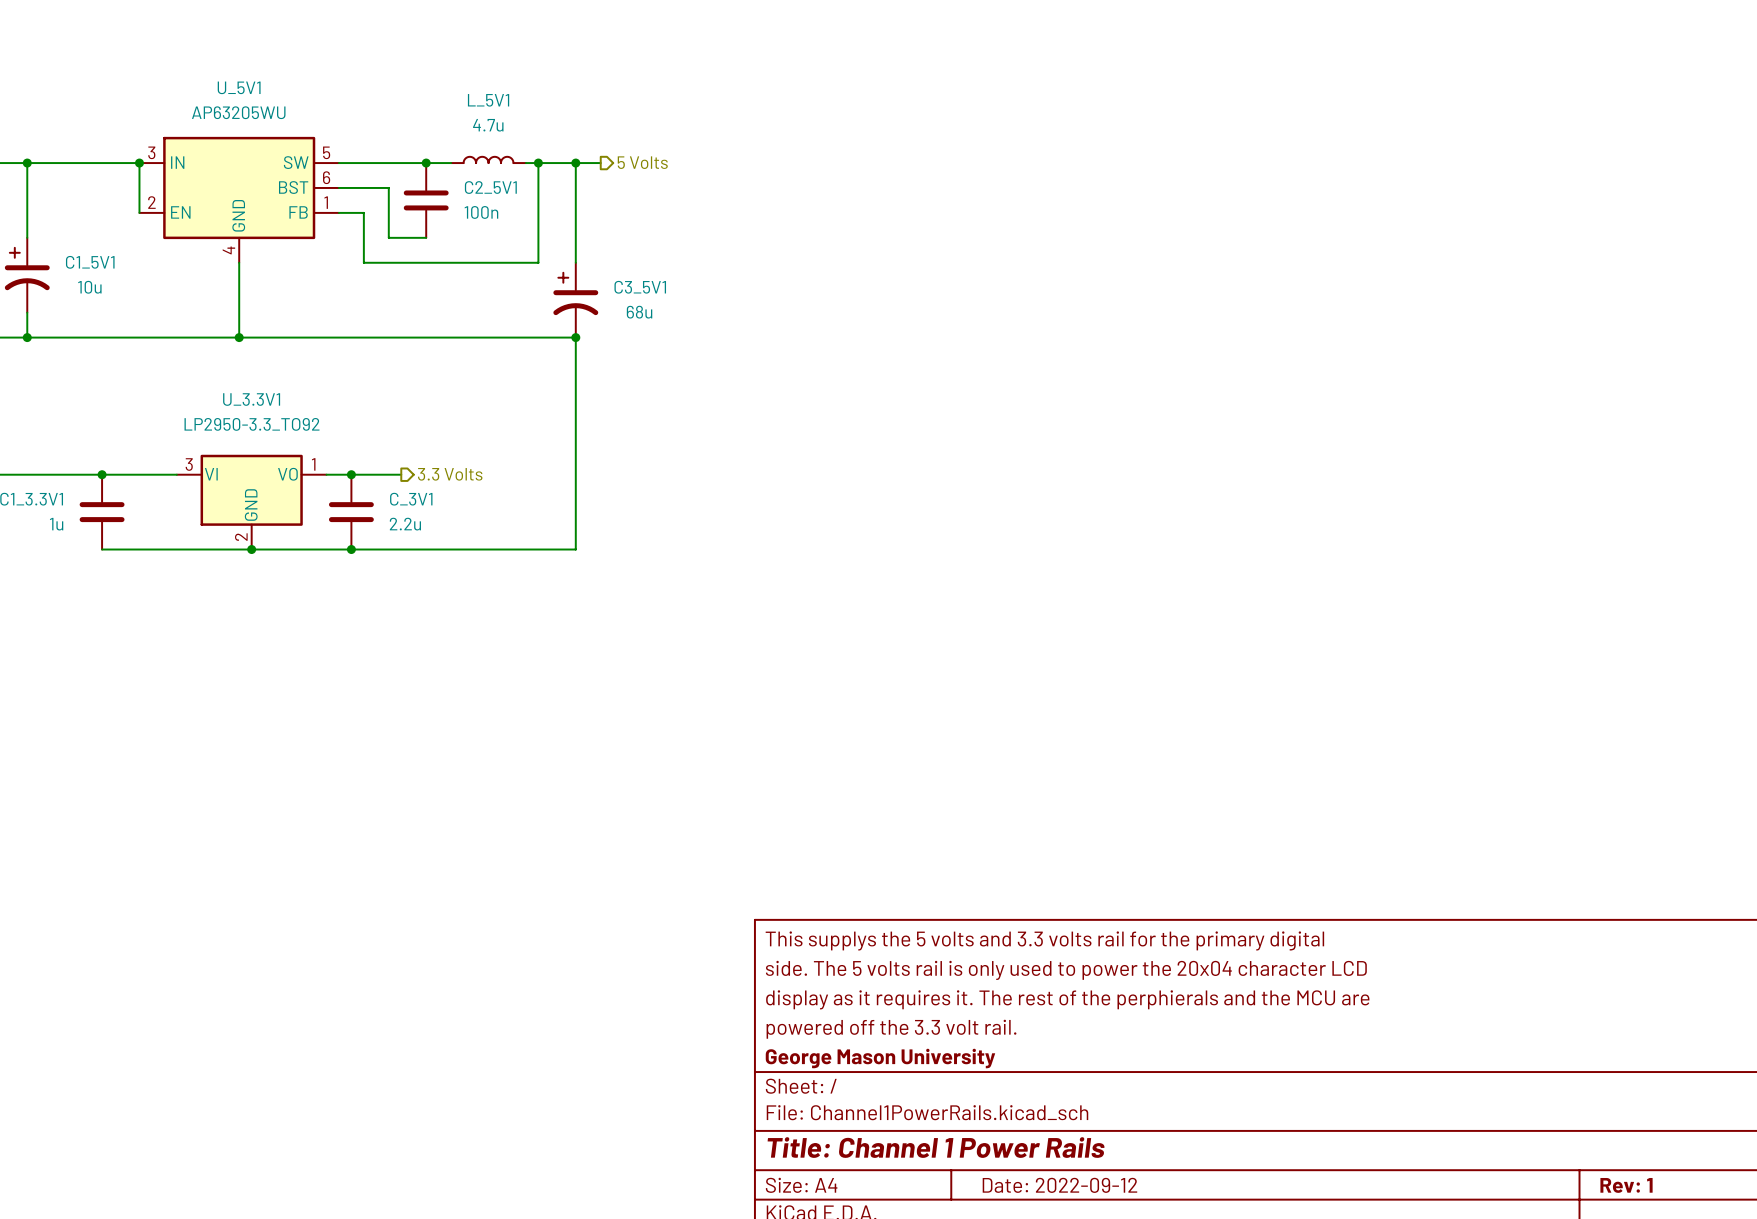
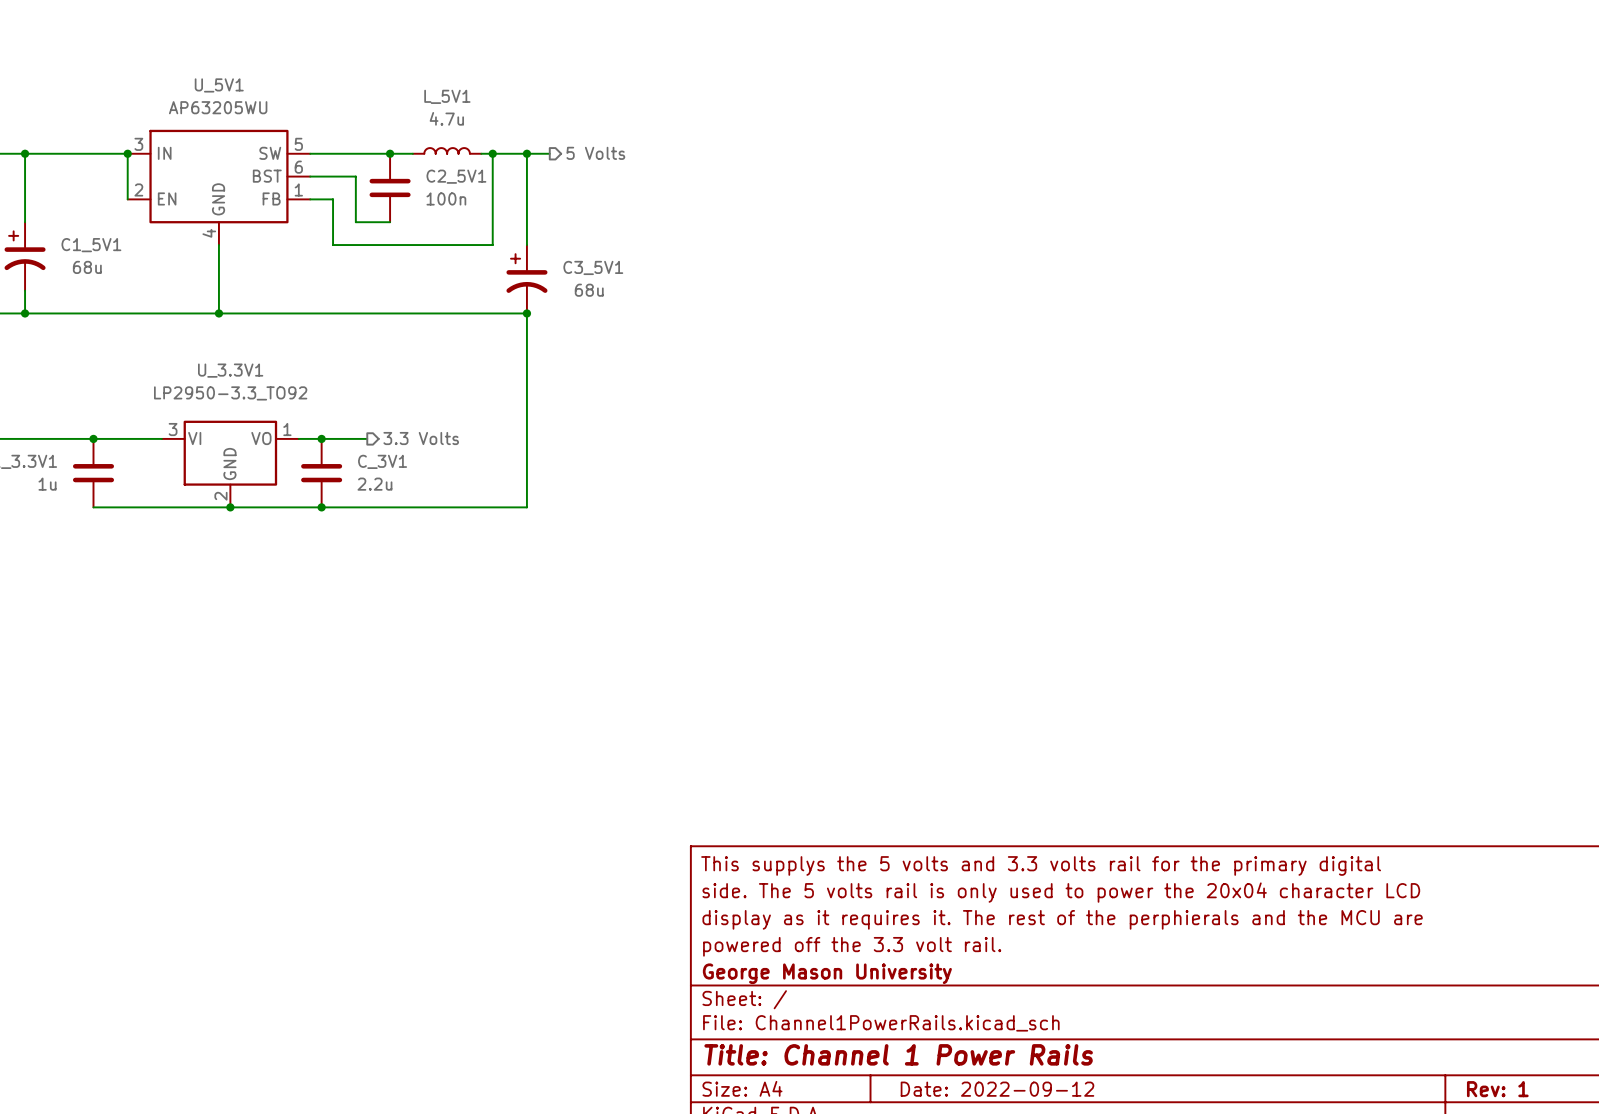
C1_5V1 value: 10u (89, 287) -> 68u (87, 267)

